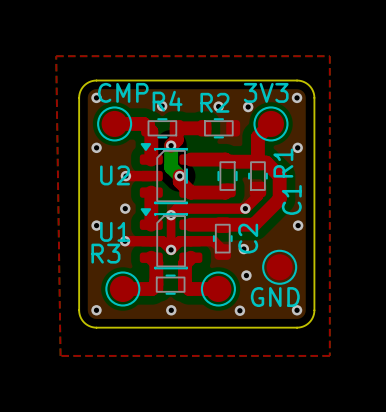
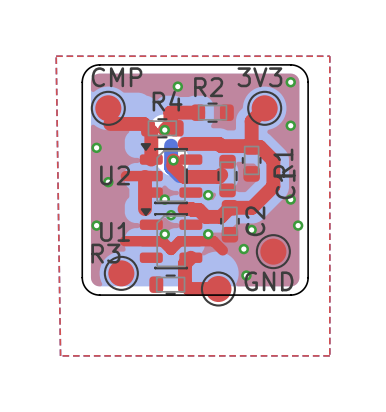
board edge: (96, 80) (297, 80) (304, 82) (310, 87) (314, 97) (314, 310) (312, 317) (307, 323) (297, 327) (96, 327) (88, 325) (82, 321) (79, 310) (79, 95) (85, 84) (96, 80) -> (99, 64) (87, 69) (82, 82) (82, 277) (87, 289) (99, 295) (290, 295) (303, 289) (308, 277) (308, 82) (303, 69) (290, 64) (99, 64)
via: none -> (290, 82)
via: none -> (177, 86)
via: (96, 97) -> none
via: (297, 97) -> none
via: (162, 106) -> none
via: (218, 106) -> none
via: (248, 107) -> none
top track: none -> (264, 108) (251, 121) (251, 146)
CMP position: (114, 123) -> (108, 108)
top track: (270, 123) (257, 136) (257, 162) (266, 162) (279, 176) (279, 199) (254, 224) (223, 224) -> none
3V3 position: (270, 123) -> (264, 108)
via: none -> (290, 125)
top track: (204, 128) (176, 128) (176, 140) (171, 145) -> (198, 112) (170, 112) (170, 124) (164, 130)
R2 position: (218, 128) -> (212, 112)
via: none -> (164, 130)
top track: none -> (184, 143) (219, 143) (221, 146) (251, 146)
via: (171, 145) -> none
top track: none -> (251, 146) (259, 146) (273, 160) (273, 186) (252, 207) (229, 207) (220, 216) (205, 216) (198, 209) (184, 209)
via: (297, 147) -> none
top track: (190, 159) (257, 161) -> none
via: none -> (173, 160)
via: (125, 176) -> none
top track: (179, 176) (179, 181) (190, 192) (225, 192) (227, 190) -> (173, 160) (173, 165) (184, 176) (219, 176) (221, 174)
via: (179, 176) -> none
C1 position: (257, 176) -> (251, 160)
via: none -> (108, 182)
top track: (257, 189) (257, 196) (245, 208) (177, 208) (171, 215) (171, 249) -> none
top track: (151, 192) (151, 224) -> (145, 176) (145, 209)
via: none -> (208, 195)
via: none -> (164, 199)
via: none -> (290, 199)
via: (125, 208) -> none
via: (245, 208) -> none
top track: (190, 224) (222, 224) -> none
via: none -> (251, 229)
via: none -> (208, 234)
C2 position: (222, 238) -> (229, 221)
via: (125, 241) -> none
via position: (171, 249) -> (164, 234)
top track: (151, 257) (156, 262) (156, 284) (151, 289) (127, 289) -> none
GND position: (279, 267) -> (273, 251)
part position: (122, 289) -> (121, 273)
via: (96, 310) -> none
via: (171, 310) -> none
via: (239, 310) -> none
via: (297, 310) -> none

